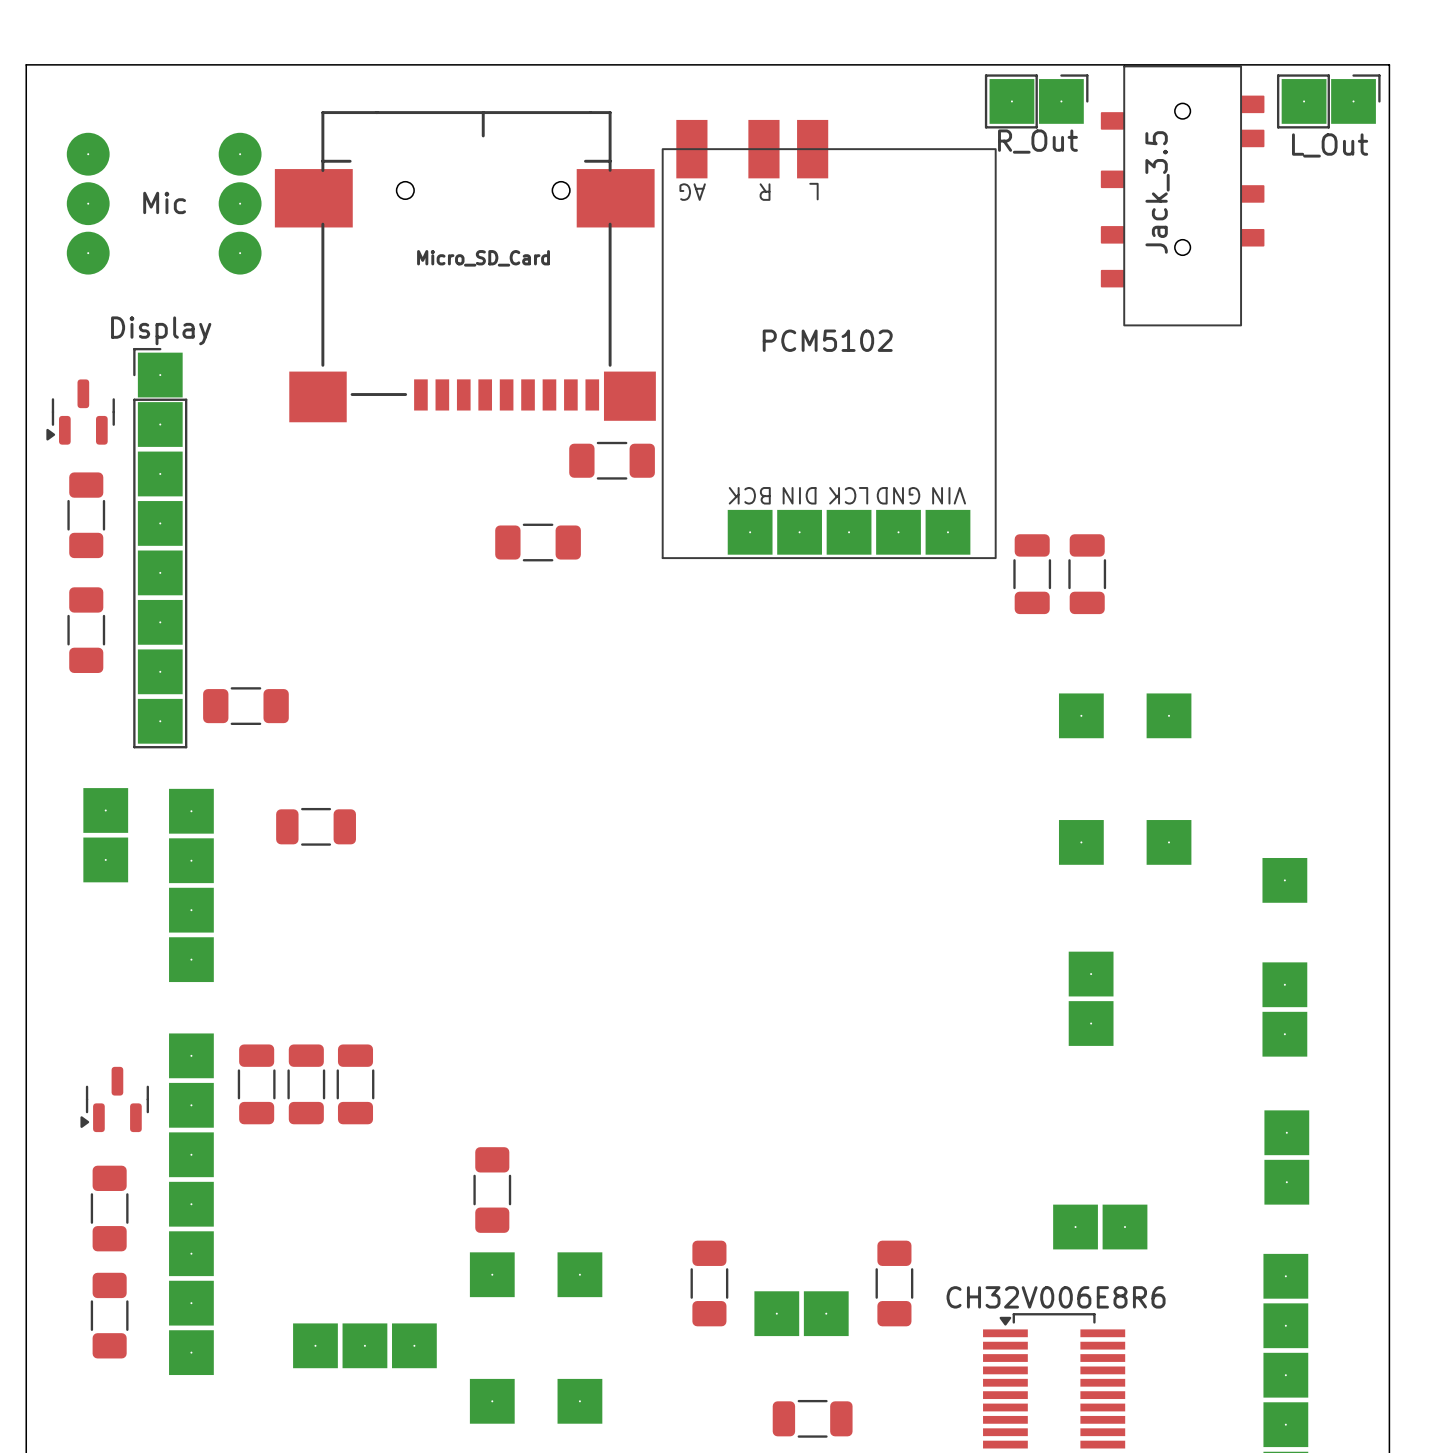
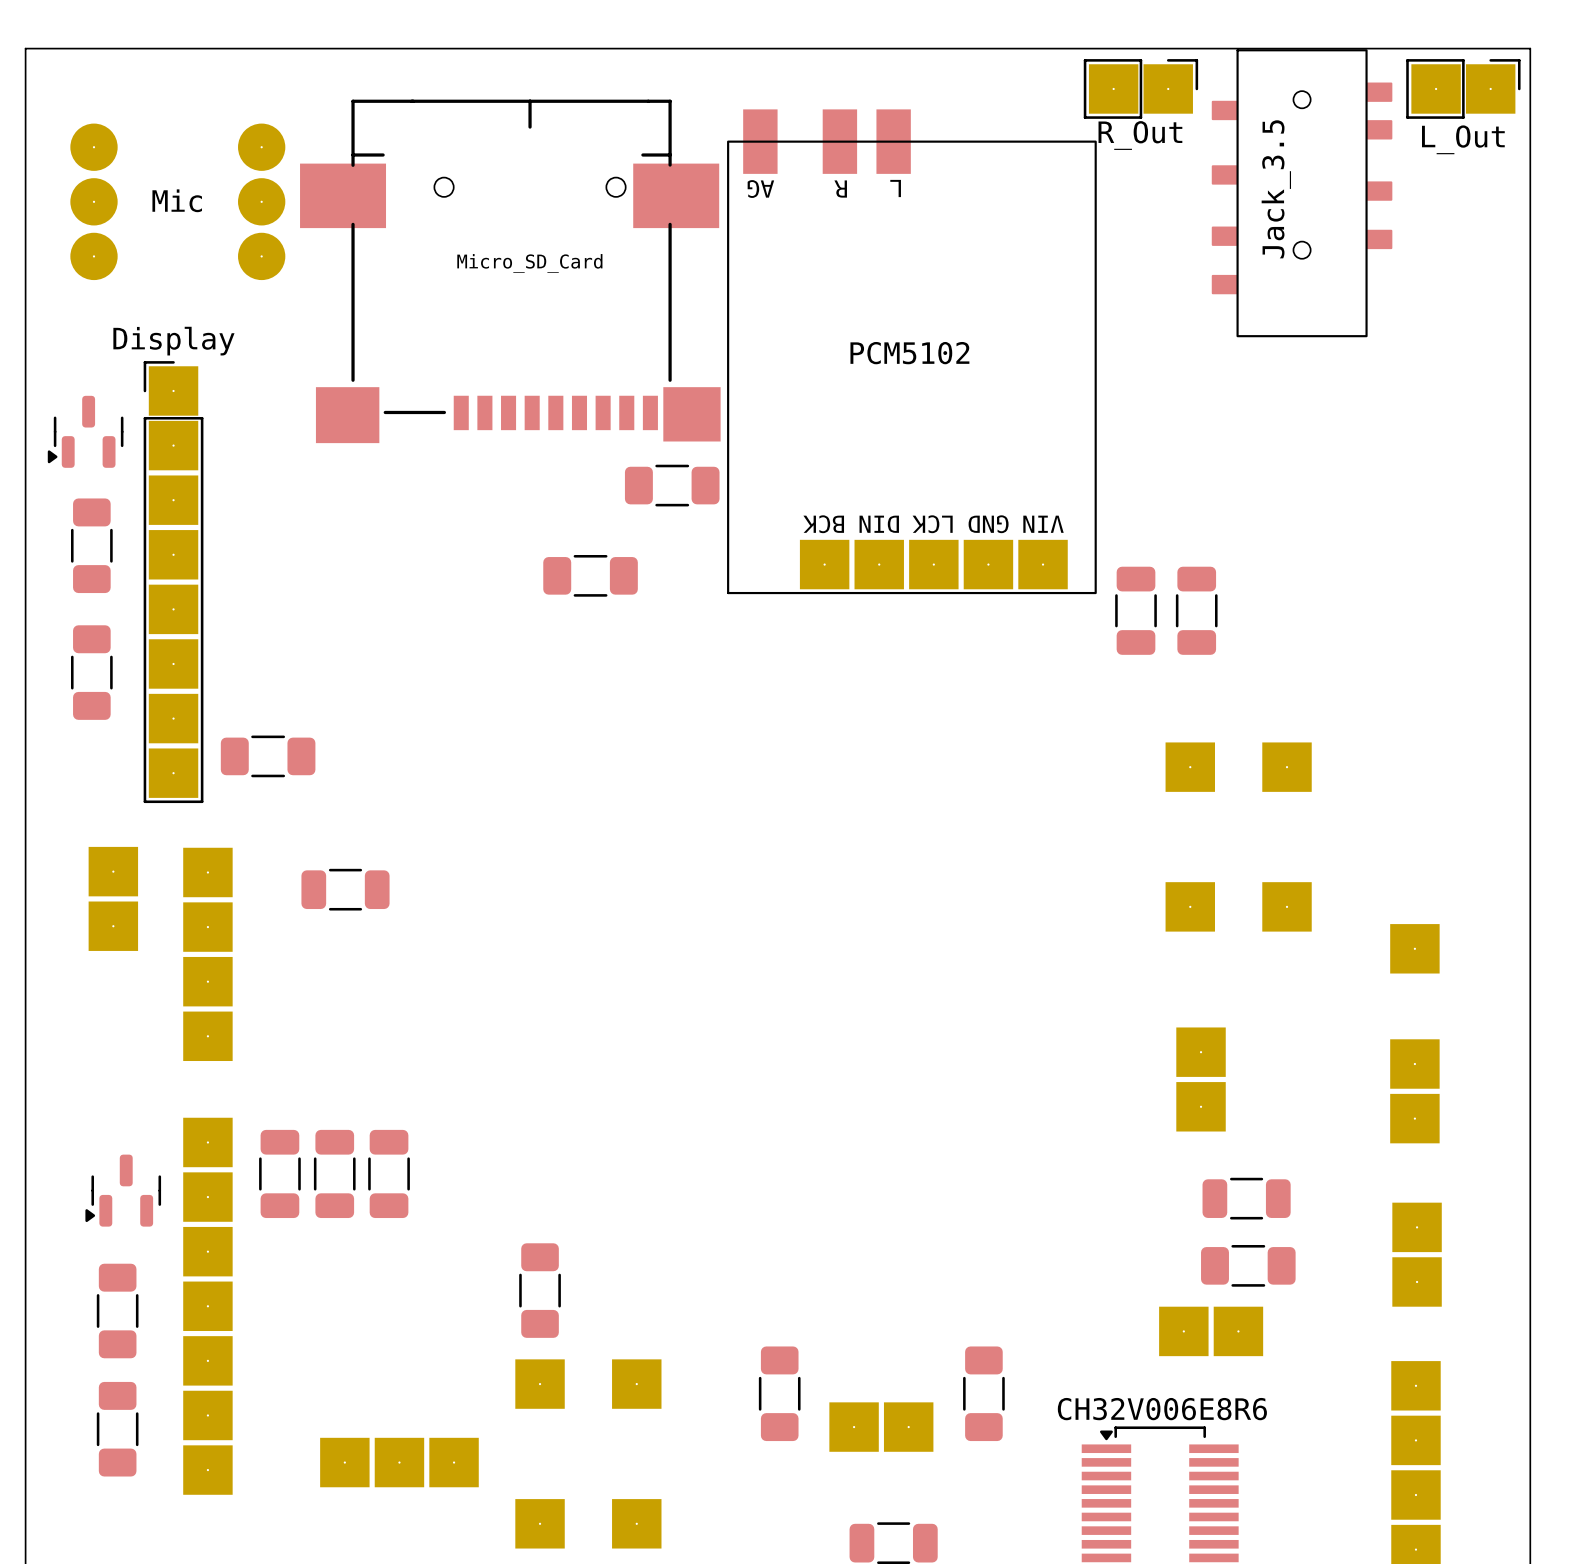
part: none -> (1246, 1198)
part: none -> (1248, 1265)

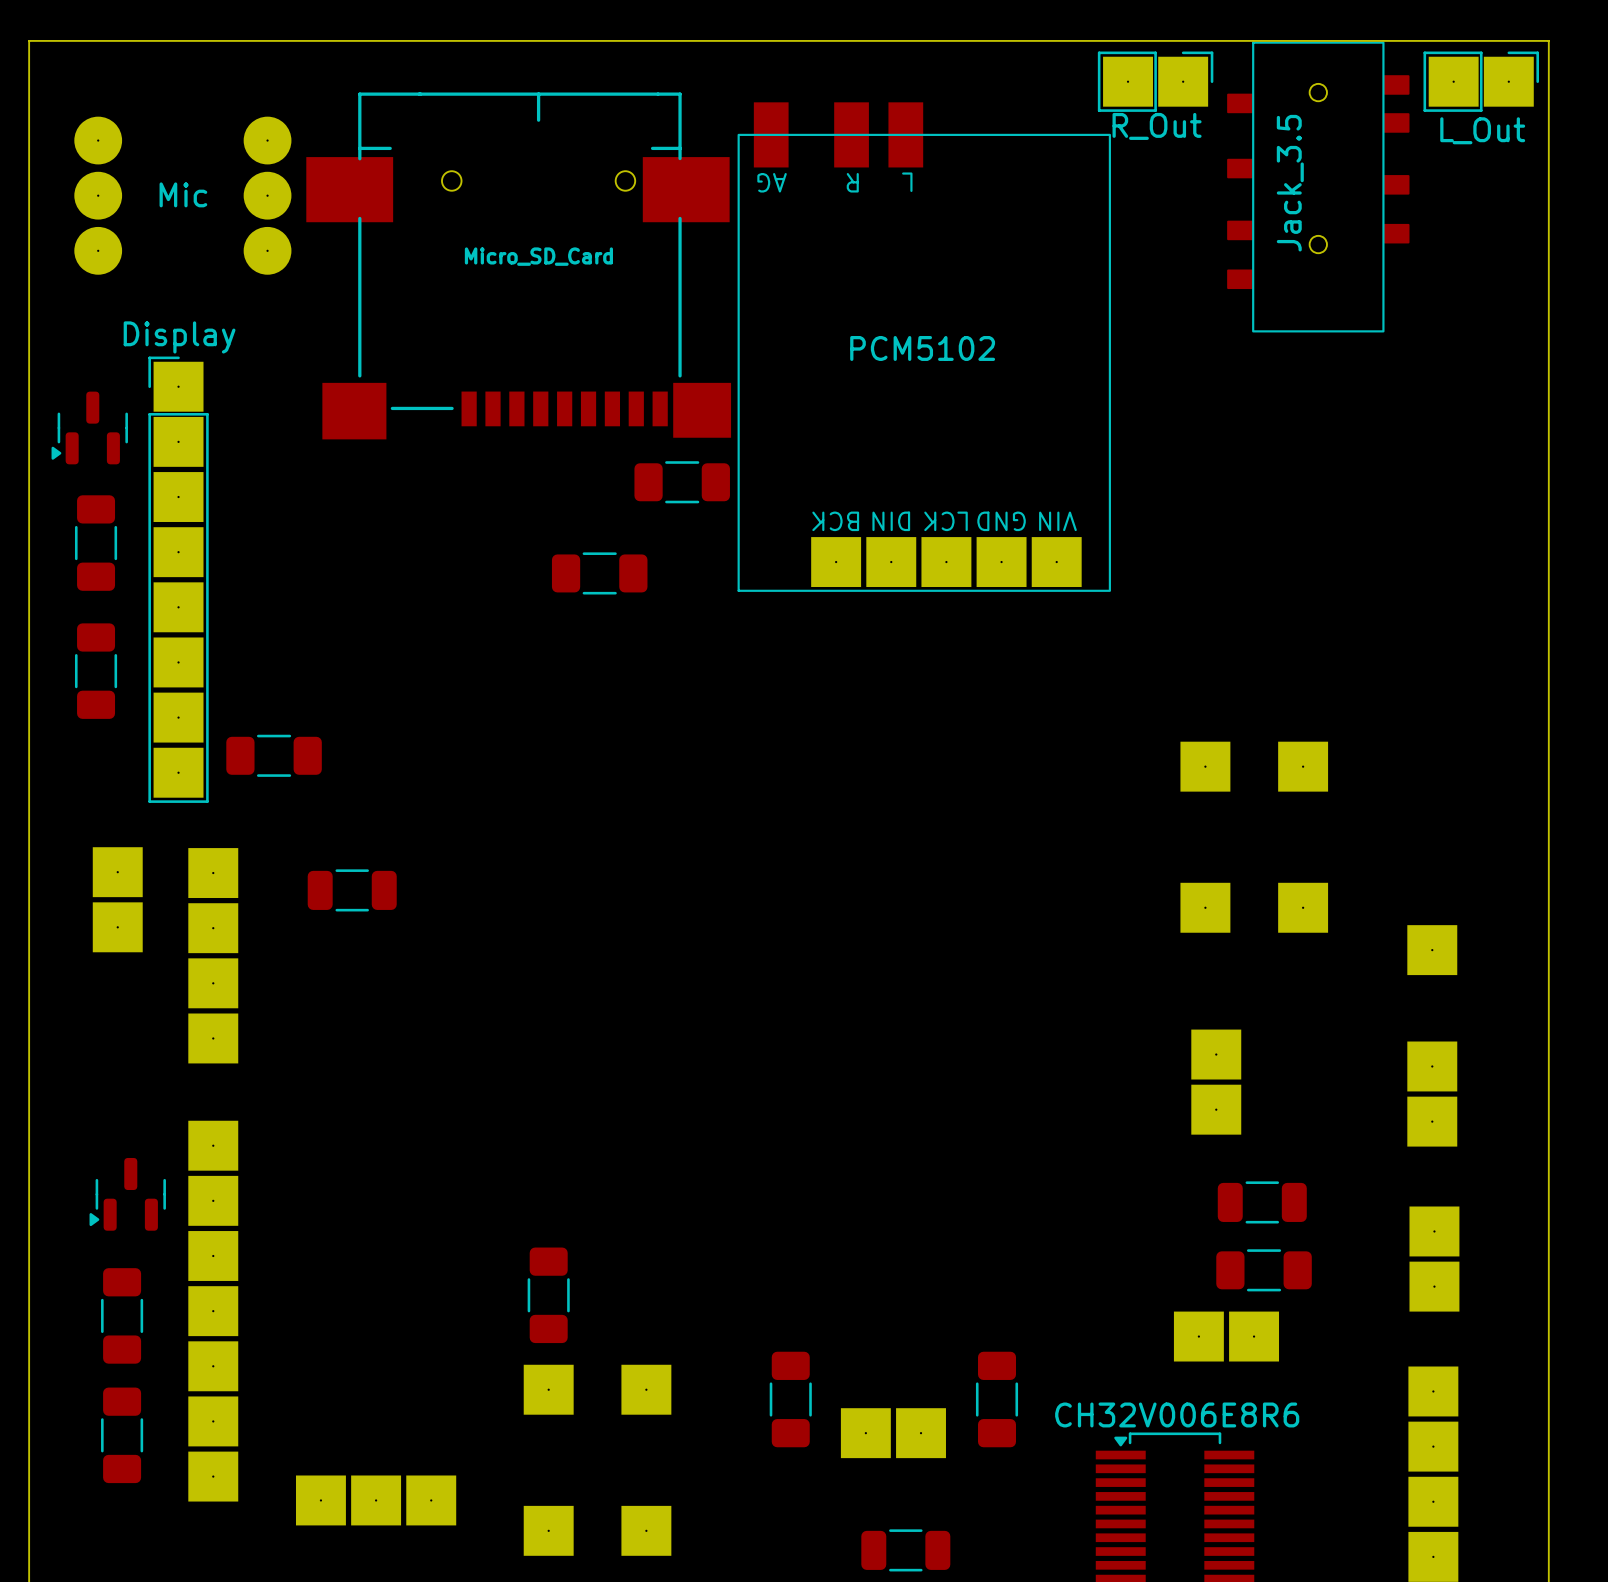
part: (1136, 610) -> none
part: (1196, 610) -> none
part: (279, 1173) -> none
part: (334, 1173) -> none
part: (389, 1173) -> none
part position: (399, 1462) -> (376, 1500)

